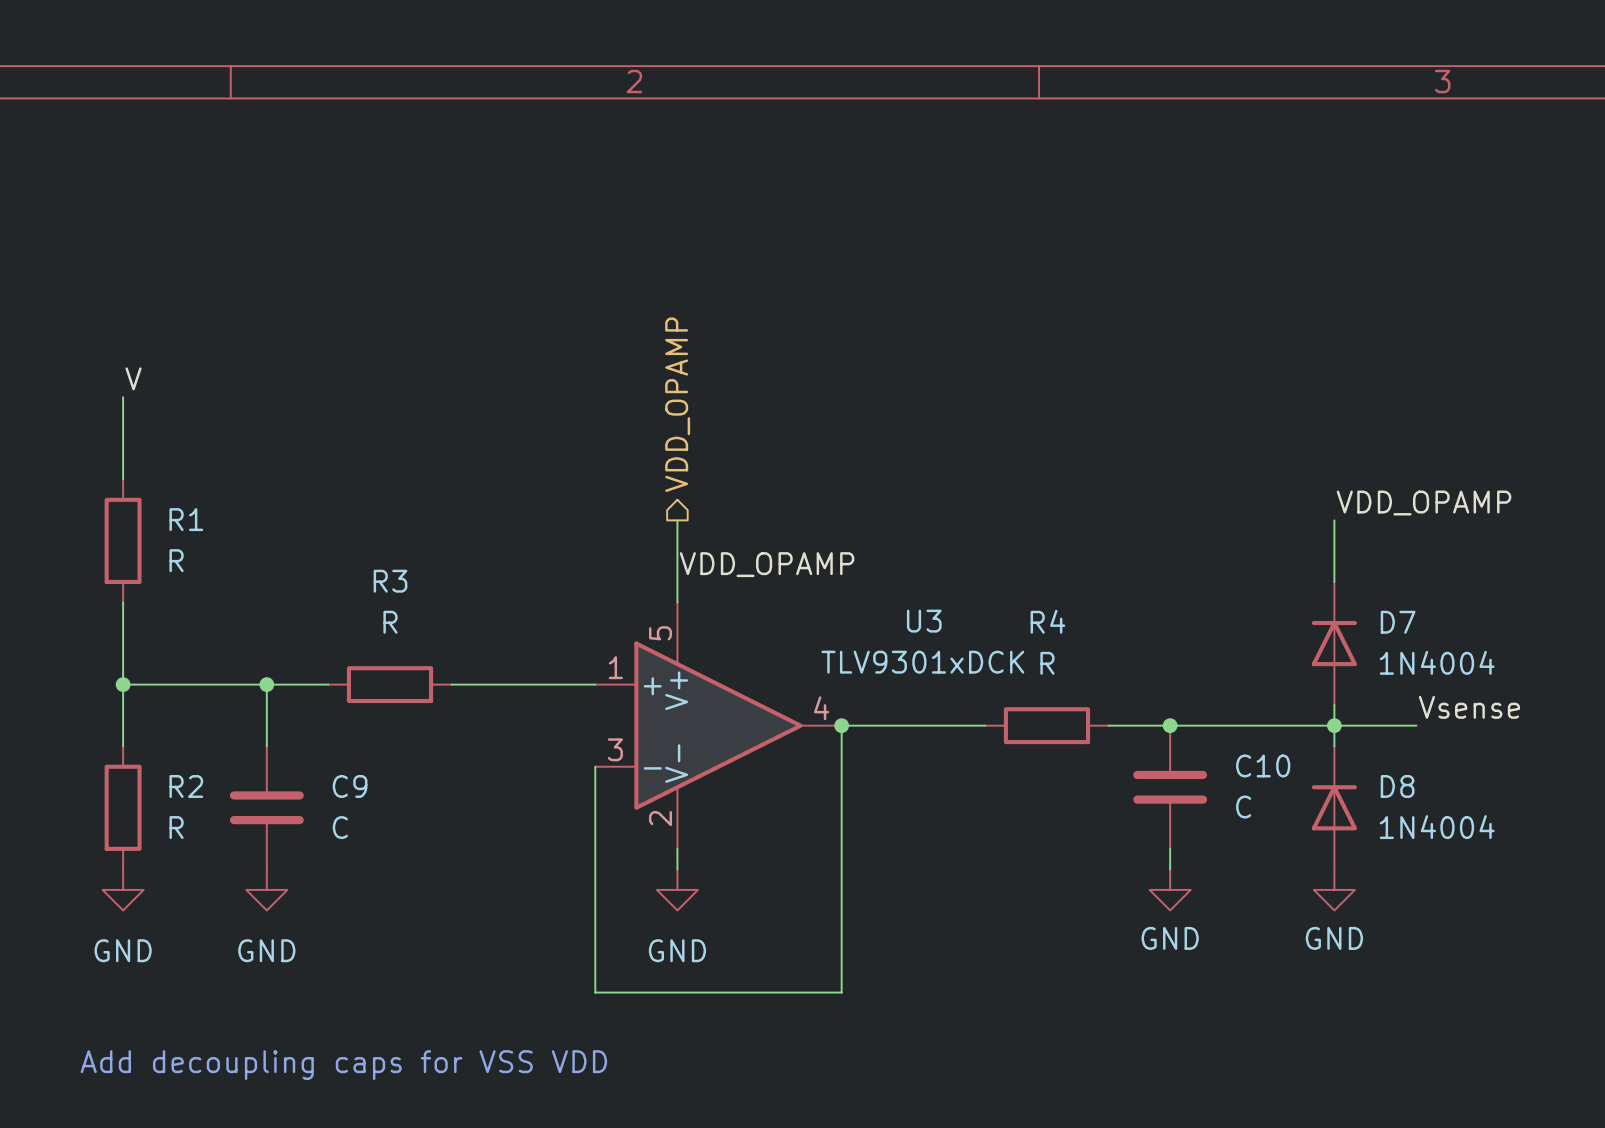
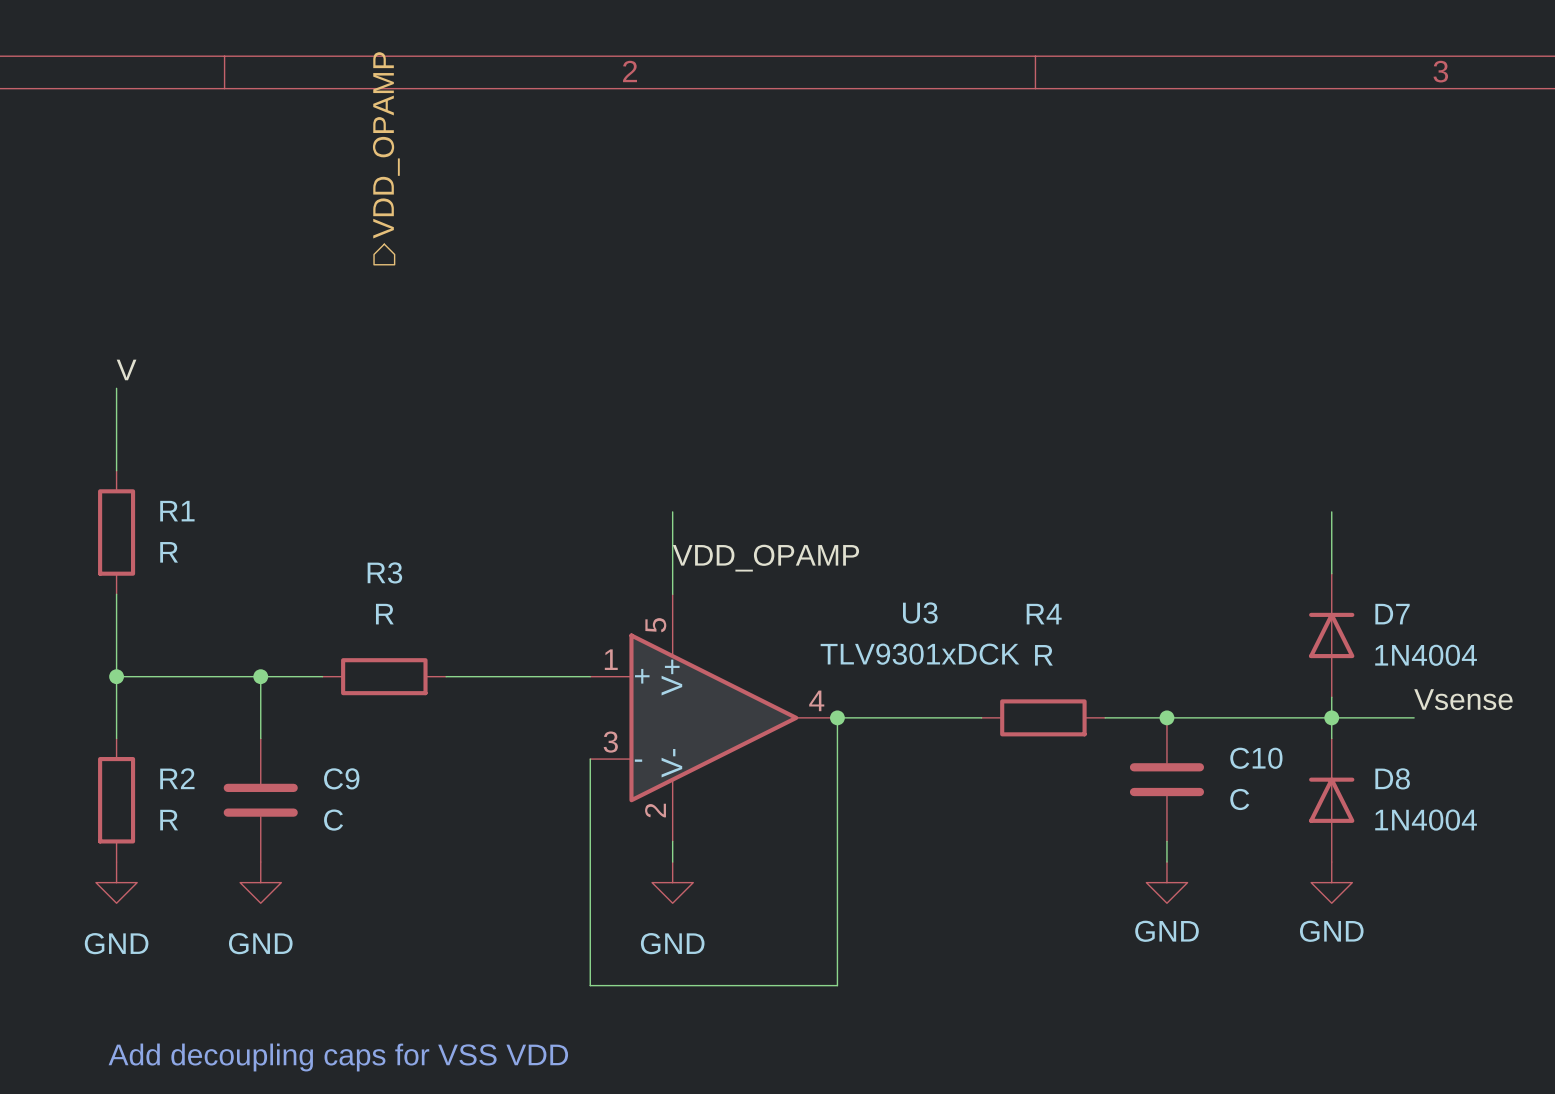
hierarchical label position: VDD_OPAMP (677, 404) -> VDD_OPAMP (386, 145)
label: VDD_OPAMP (1423, 503) -> none

